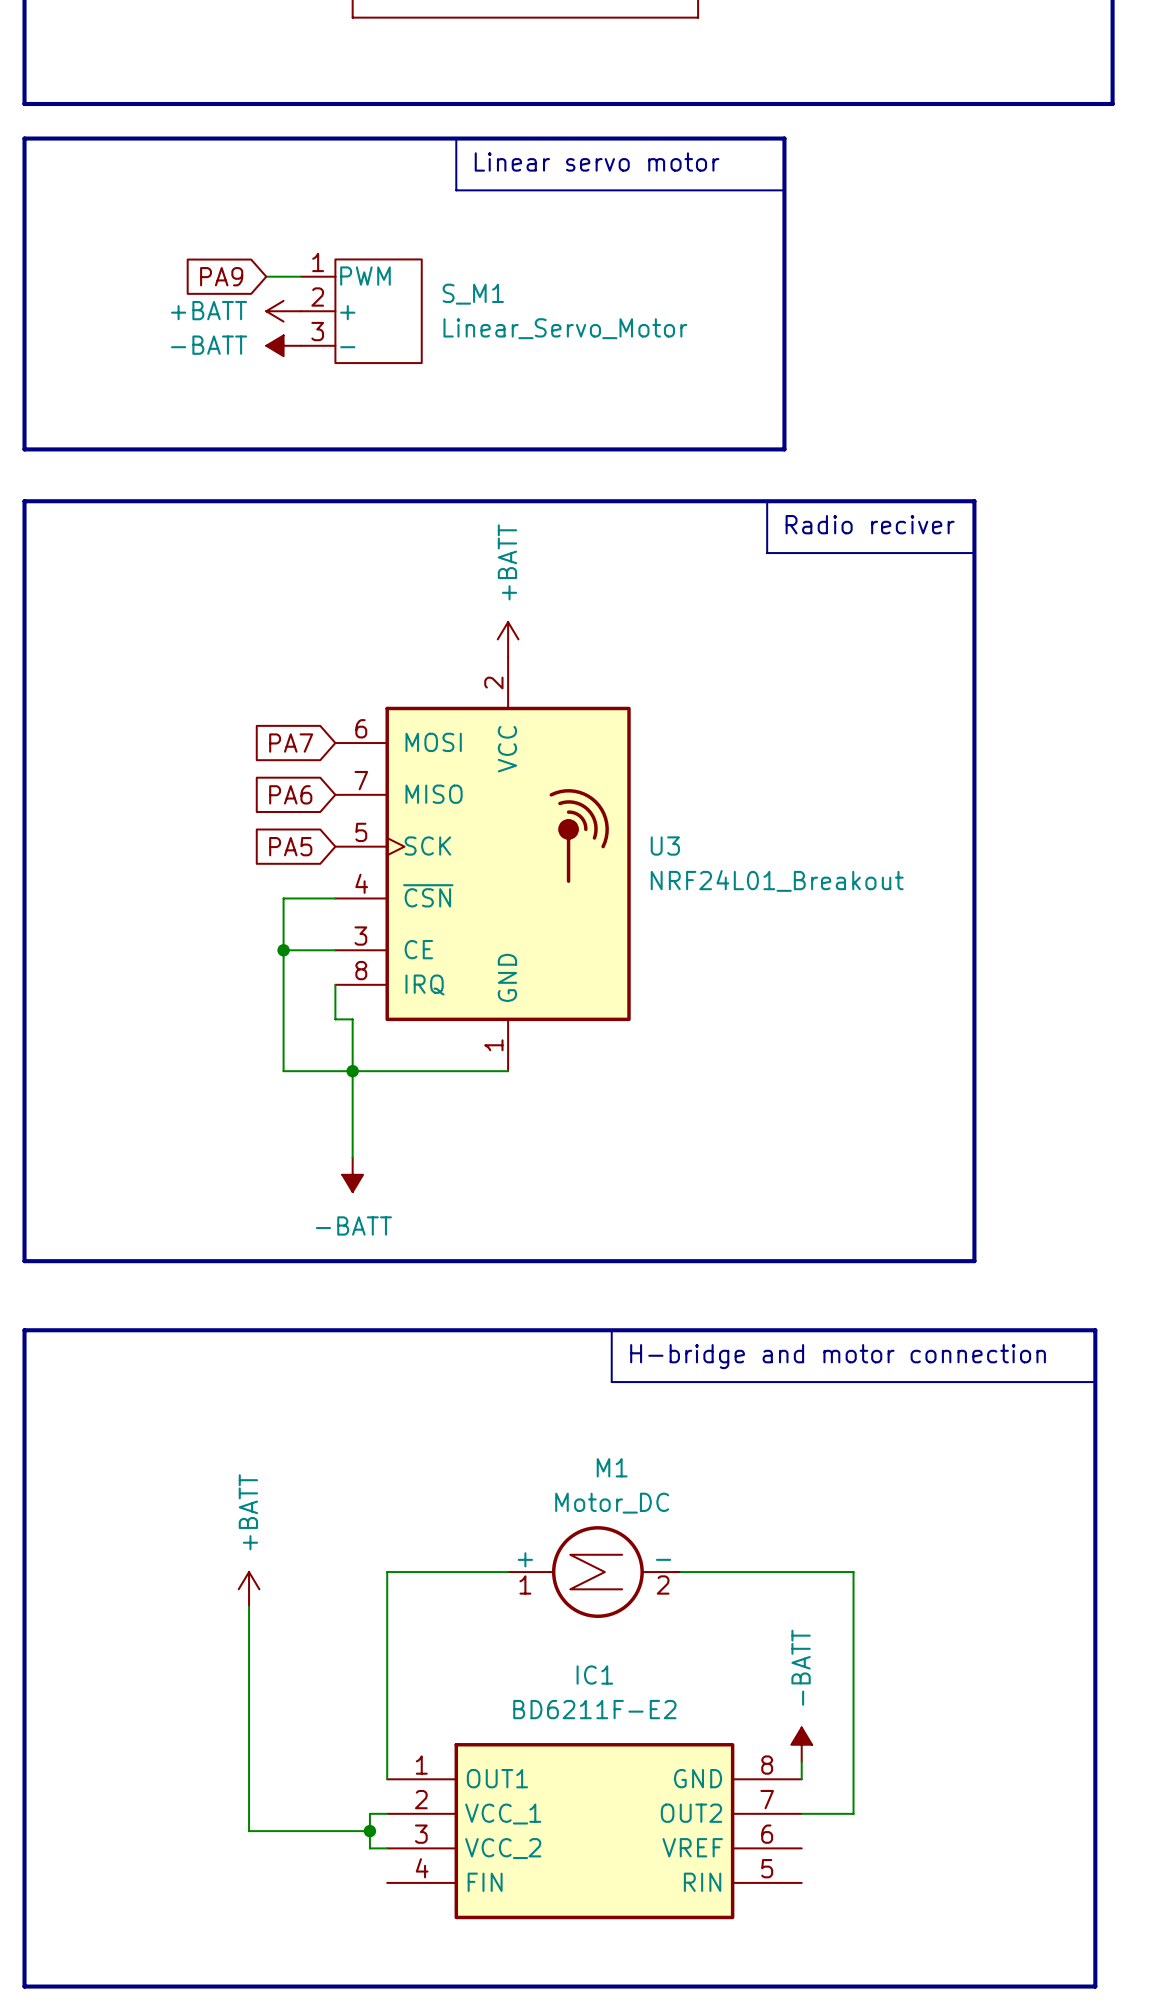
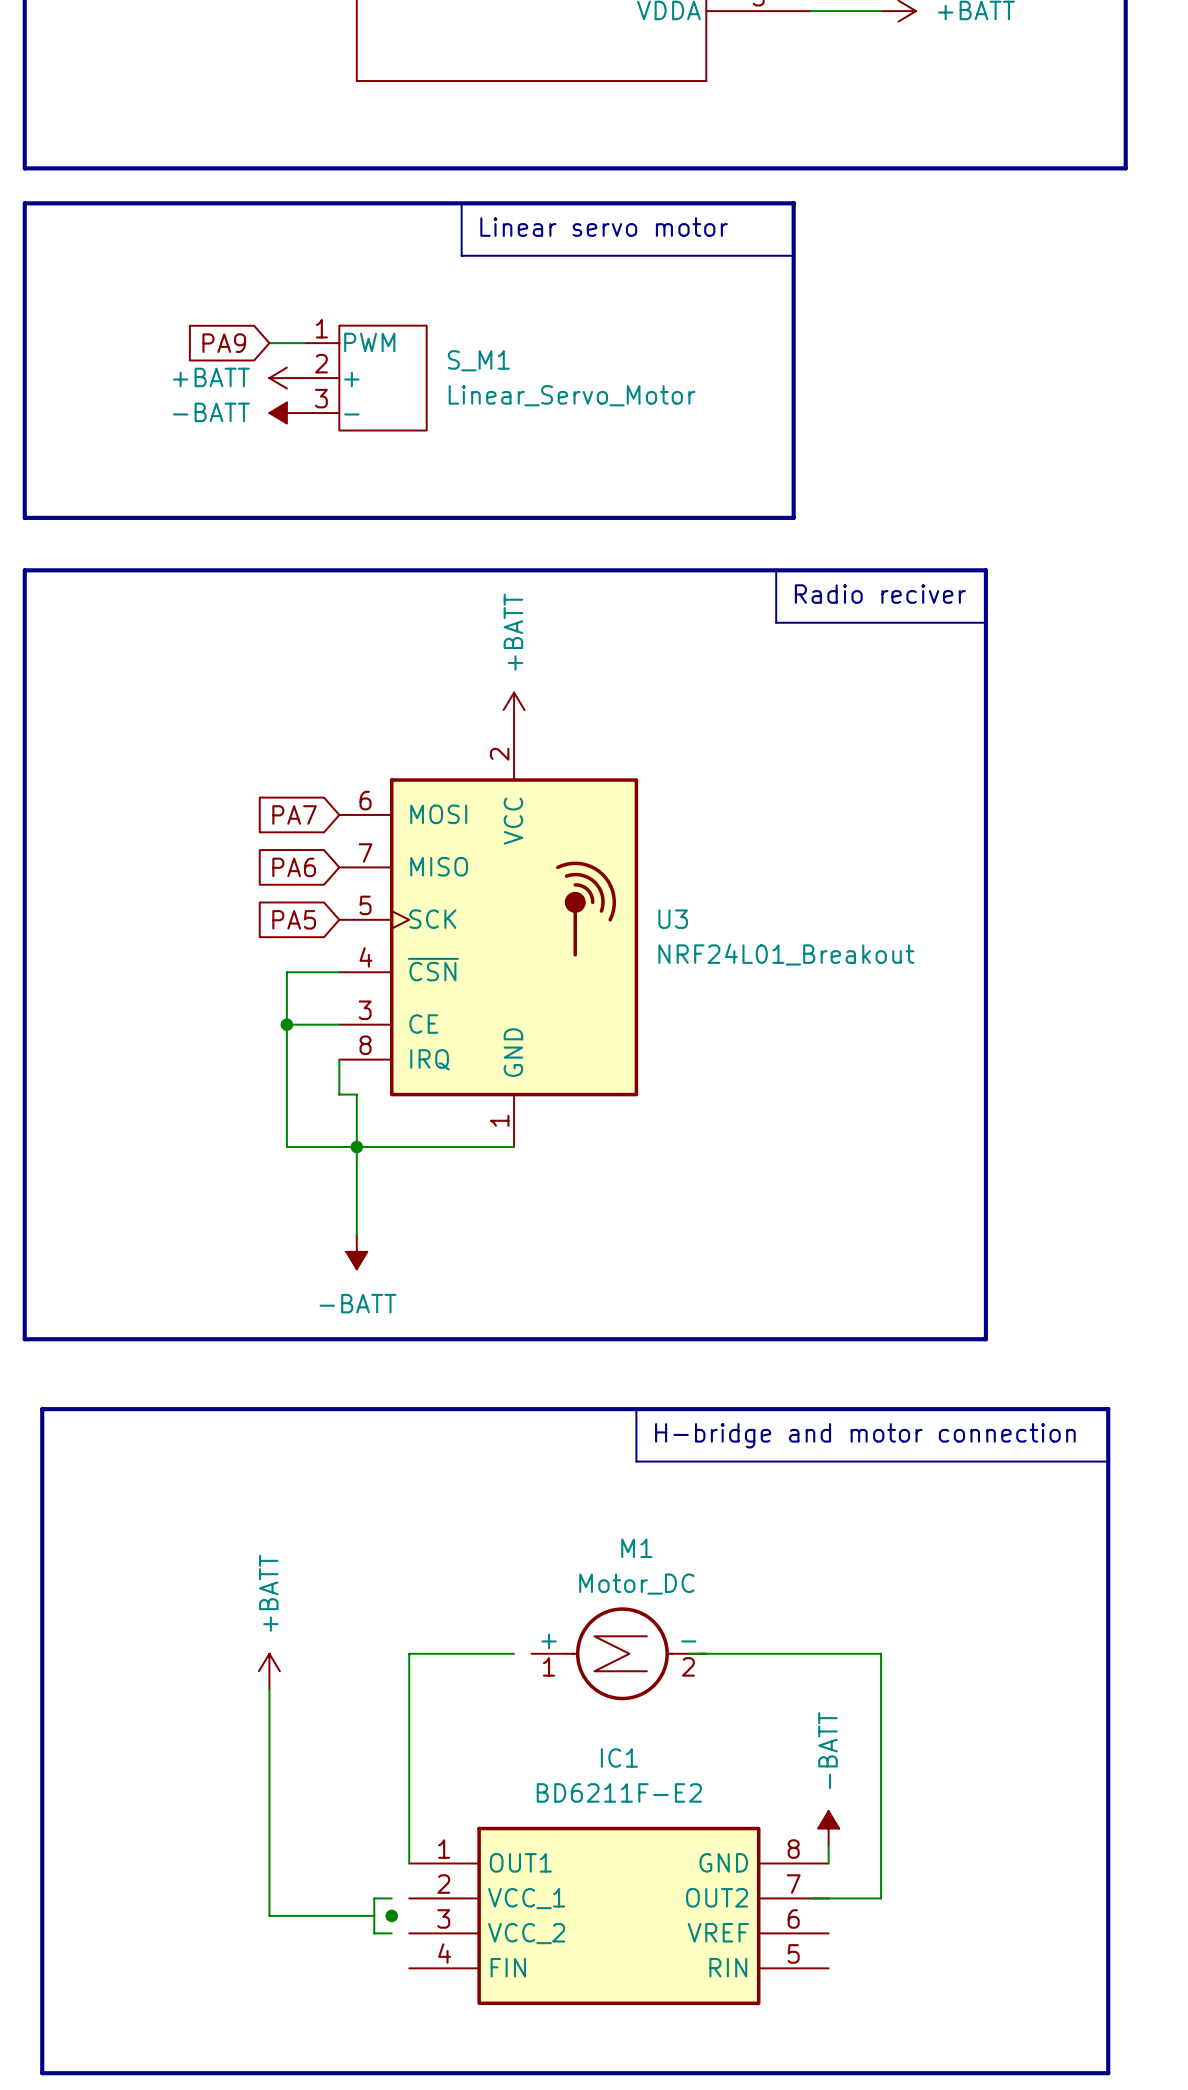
line: (41, 1330) (24, 1330) (24, 1986) (41, 1986) -> (42, 1409) (42, 2073)
line: (629, 1330) (611, 1330) (611, 1382) (629, 1382) -> (636, 1409) (636, 1461)
text position: H-bridge and motor connection (838, 1356) -> H-bridge and motor connection (865, 1435)
wire: (404, 1572) (387, 1572) (387, 1779) -> (409, 1653) (409, 1863)
M1 position: (594, 1572) -> (618, 1653)
wire: (853, 1572) (853, 1813) -> (863, 1653) (881, 1653) (881, 1898) (863, 1898)
power symbol position: +BATT (249, 1589) -> +BATT (269, 1671)
wire: (249, 1606) (249, 1831) (266, 1831) -> (269, 1688) (269, 1915)
power symbol position: -BATT (801, 1744) -> -BATT (828, 1828)
wire: (801, 1762) (801, 1779) -> (828, 1846) (828, 1863)
junction position: (369, 1831) -> (391, 1915)
IC1 position: (594, 1831) -> (618, 1915)

